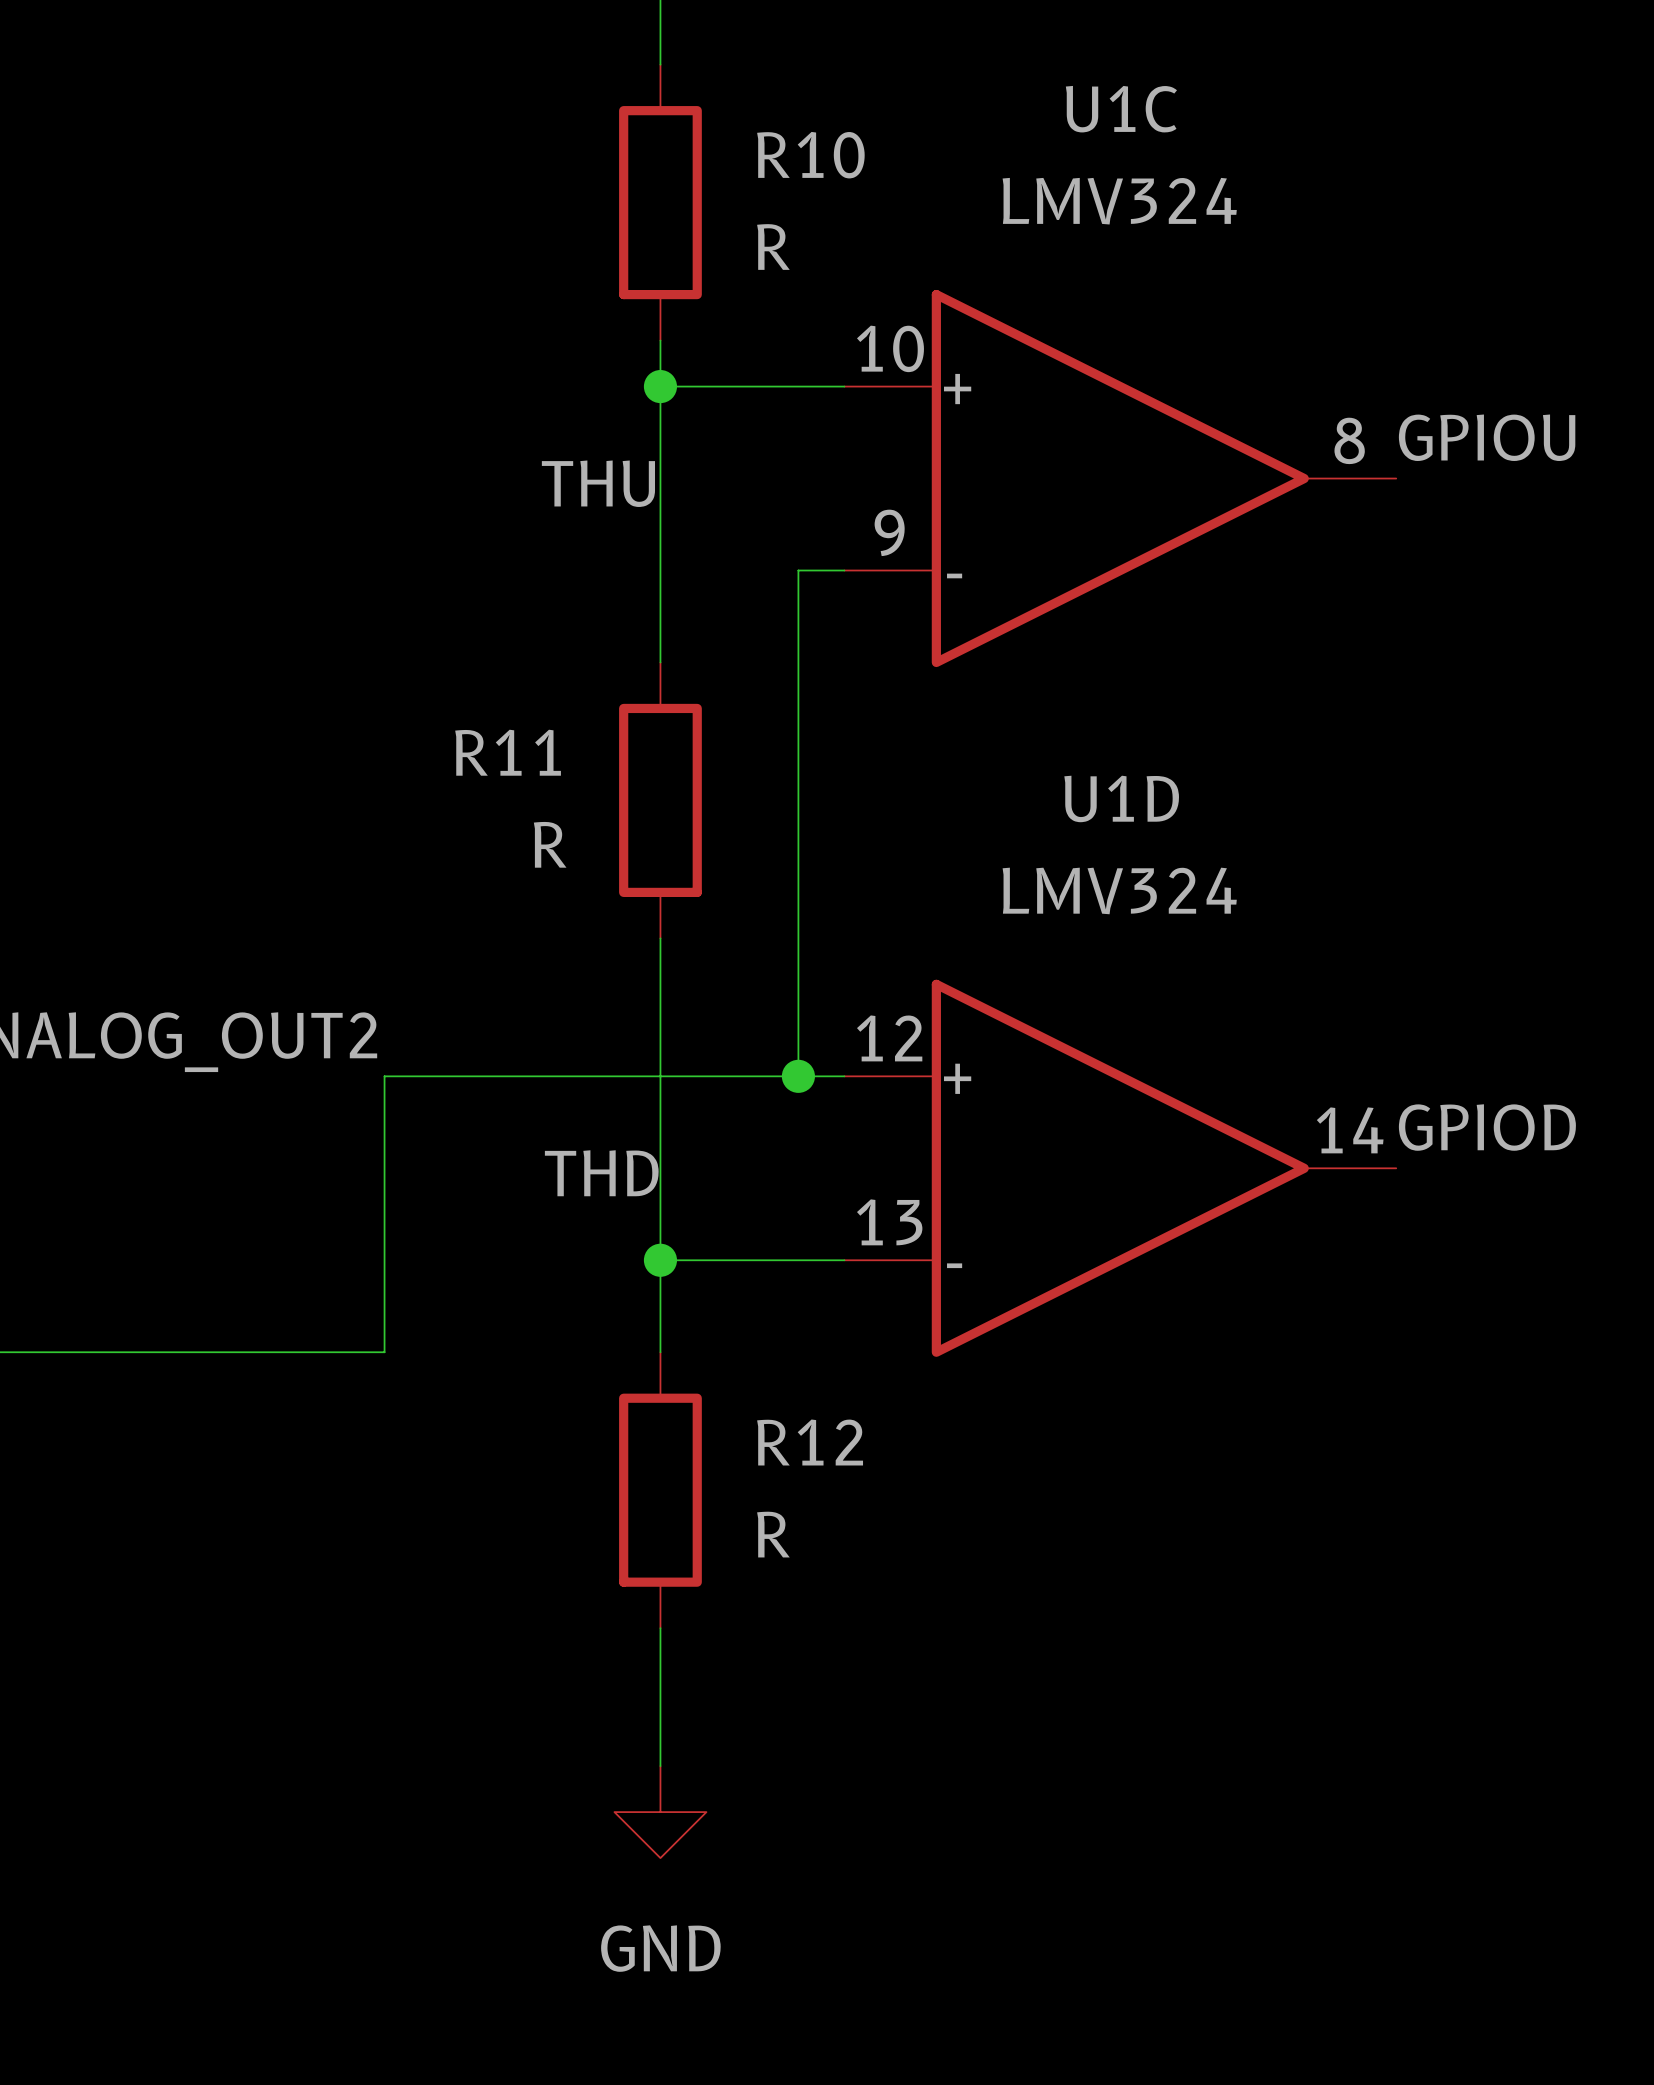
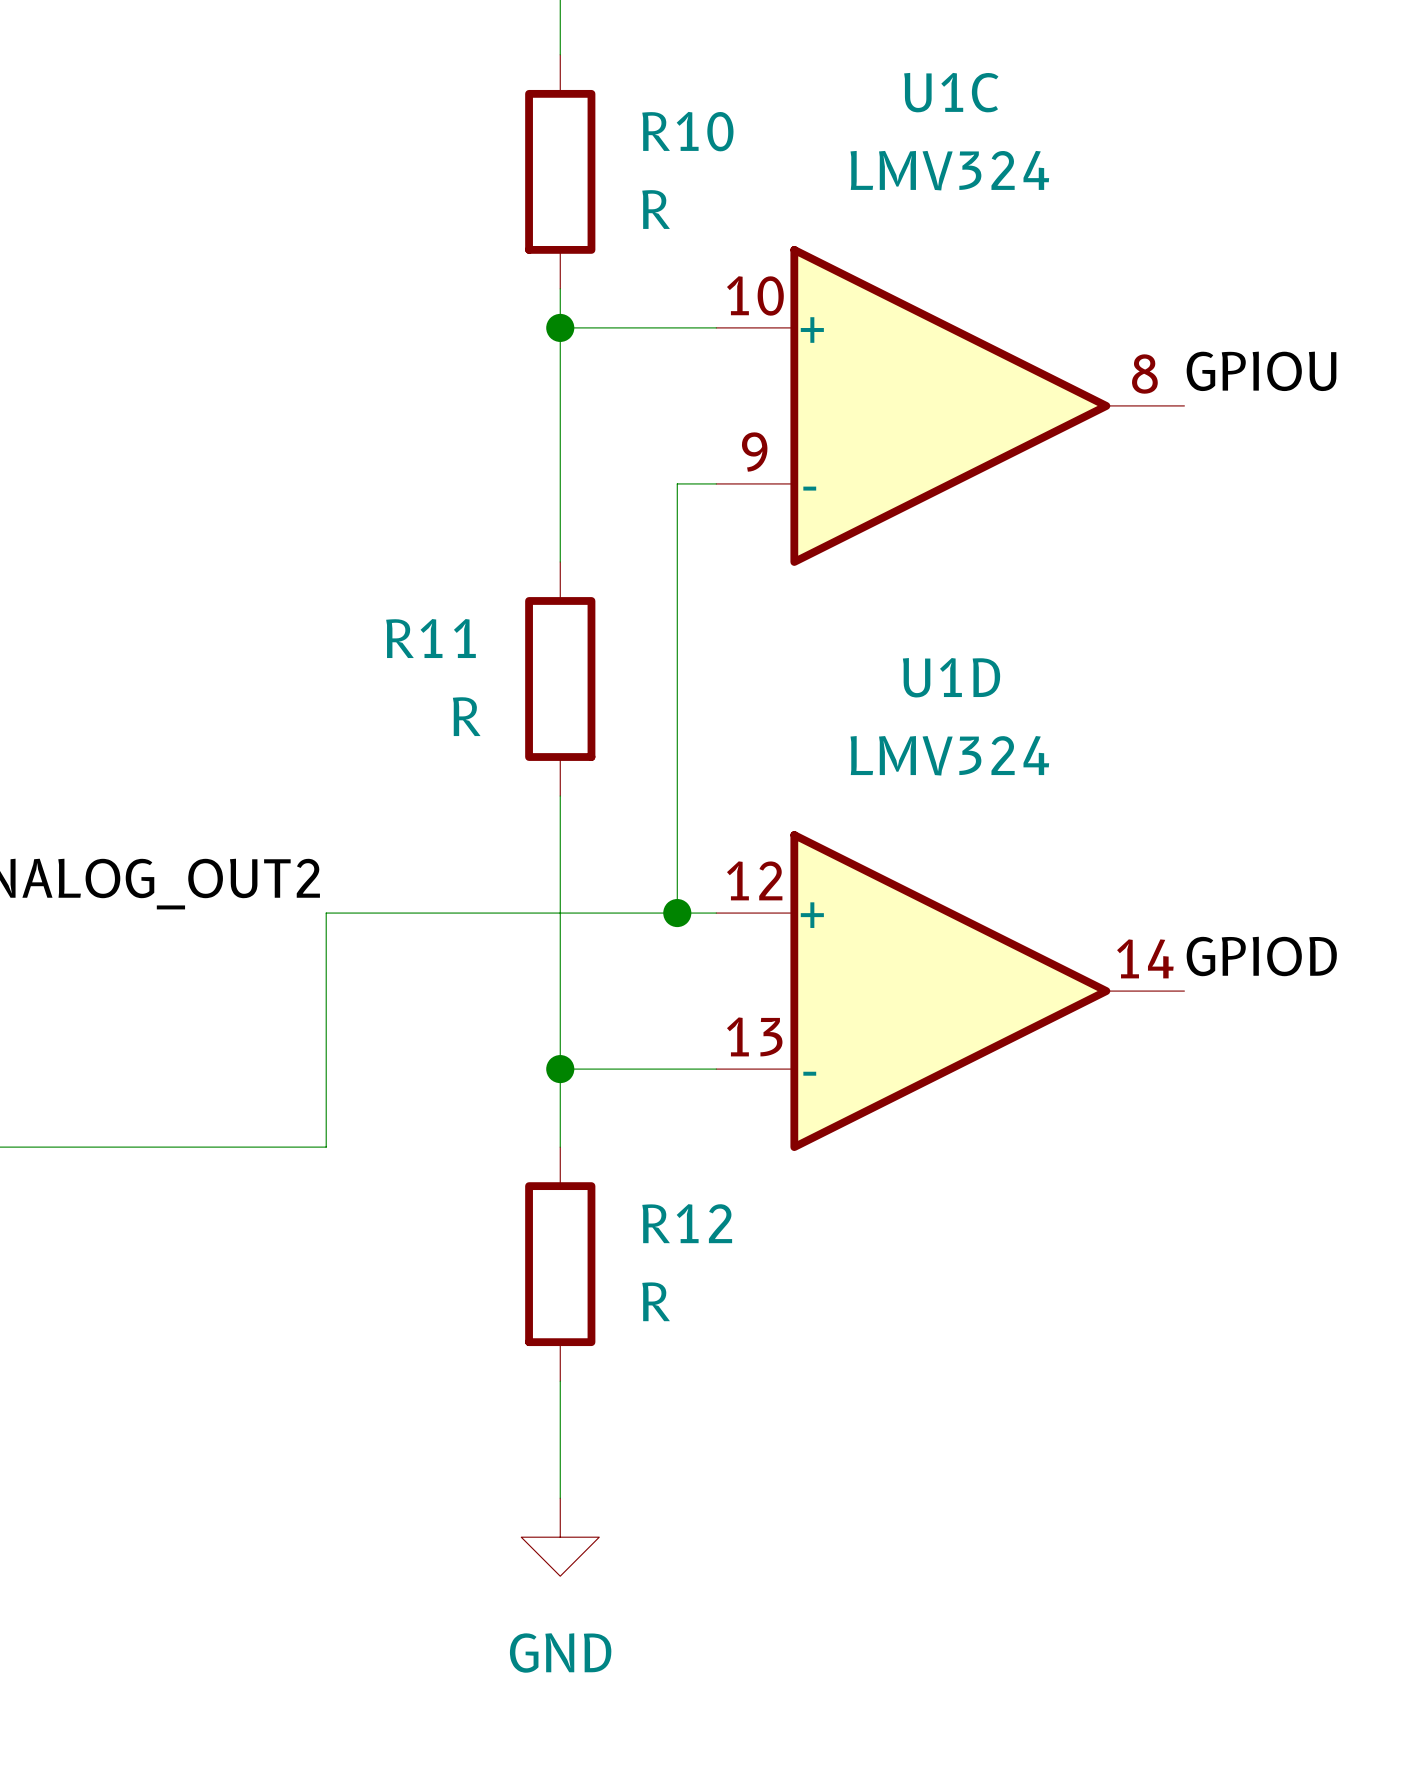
label: THU (598, 483) -> none
label: THD (601, 1173) -> none

